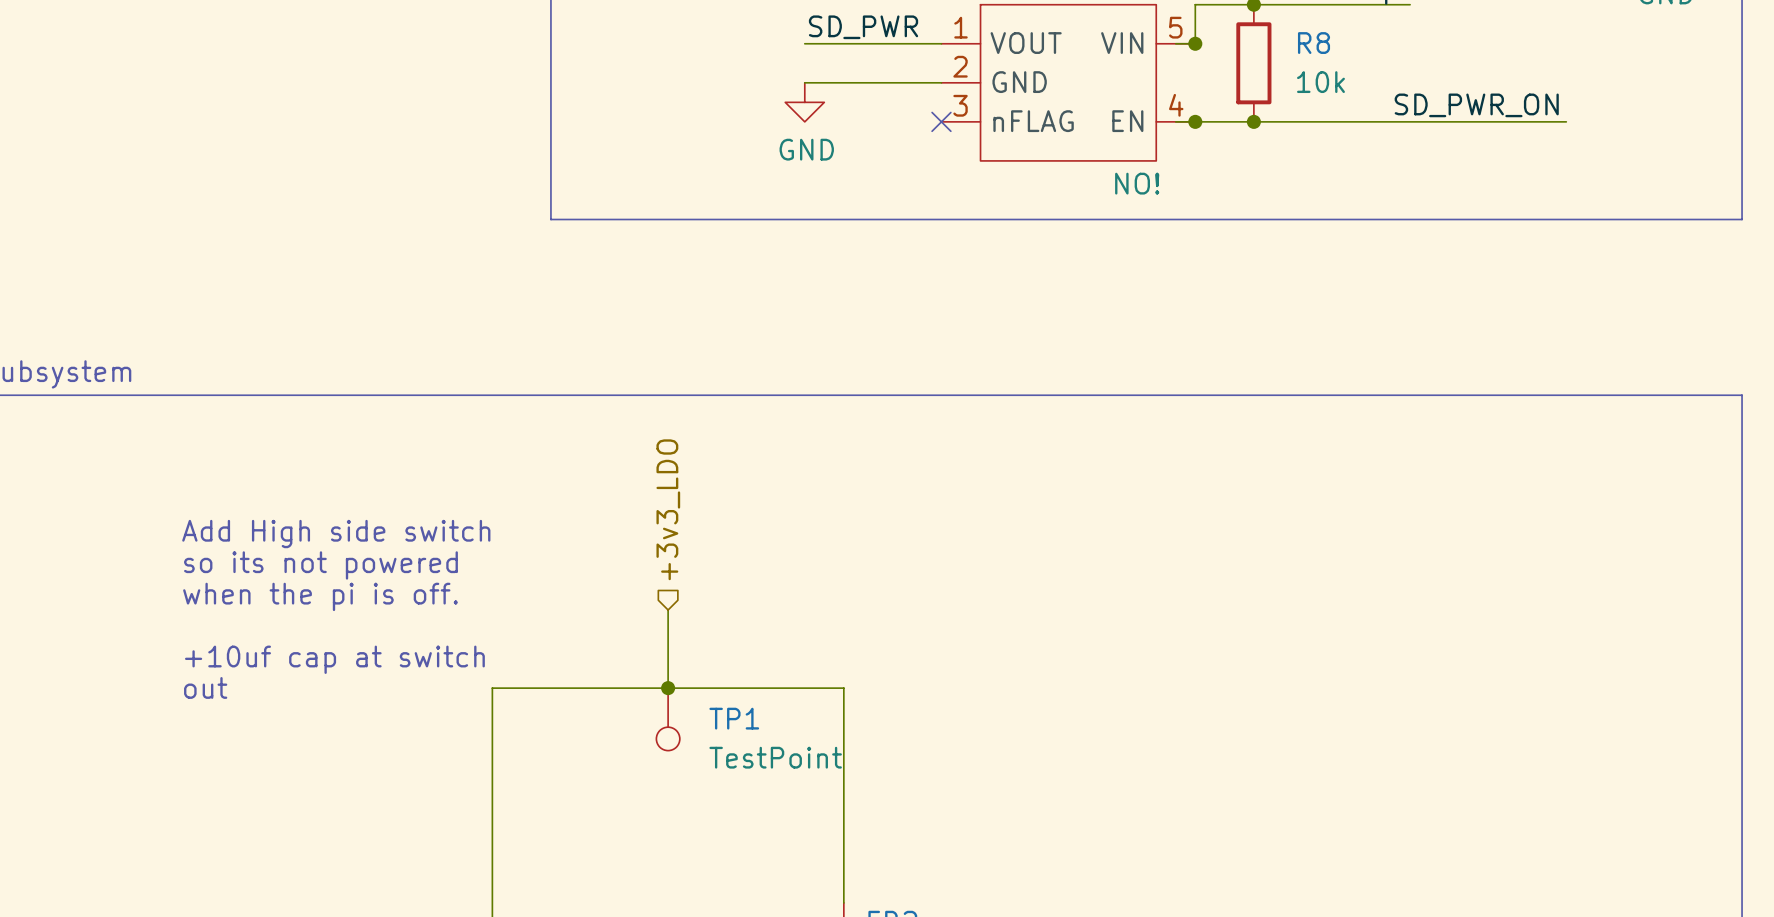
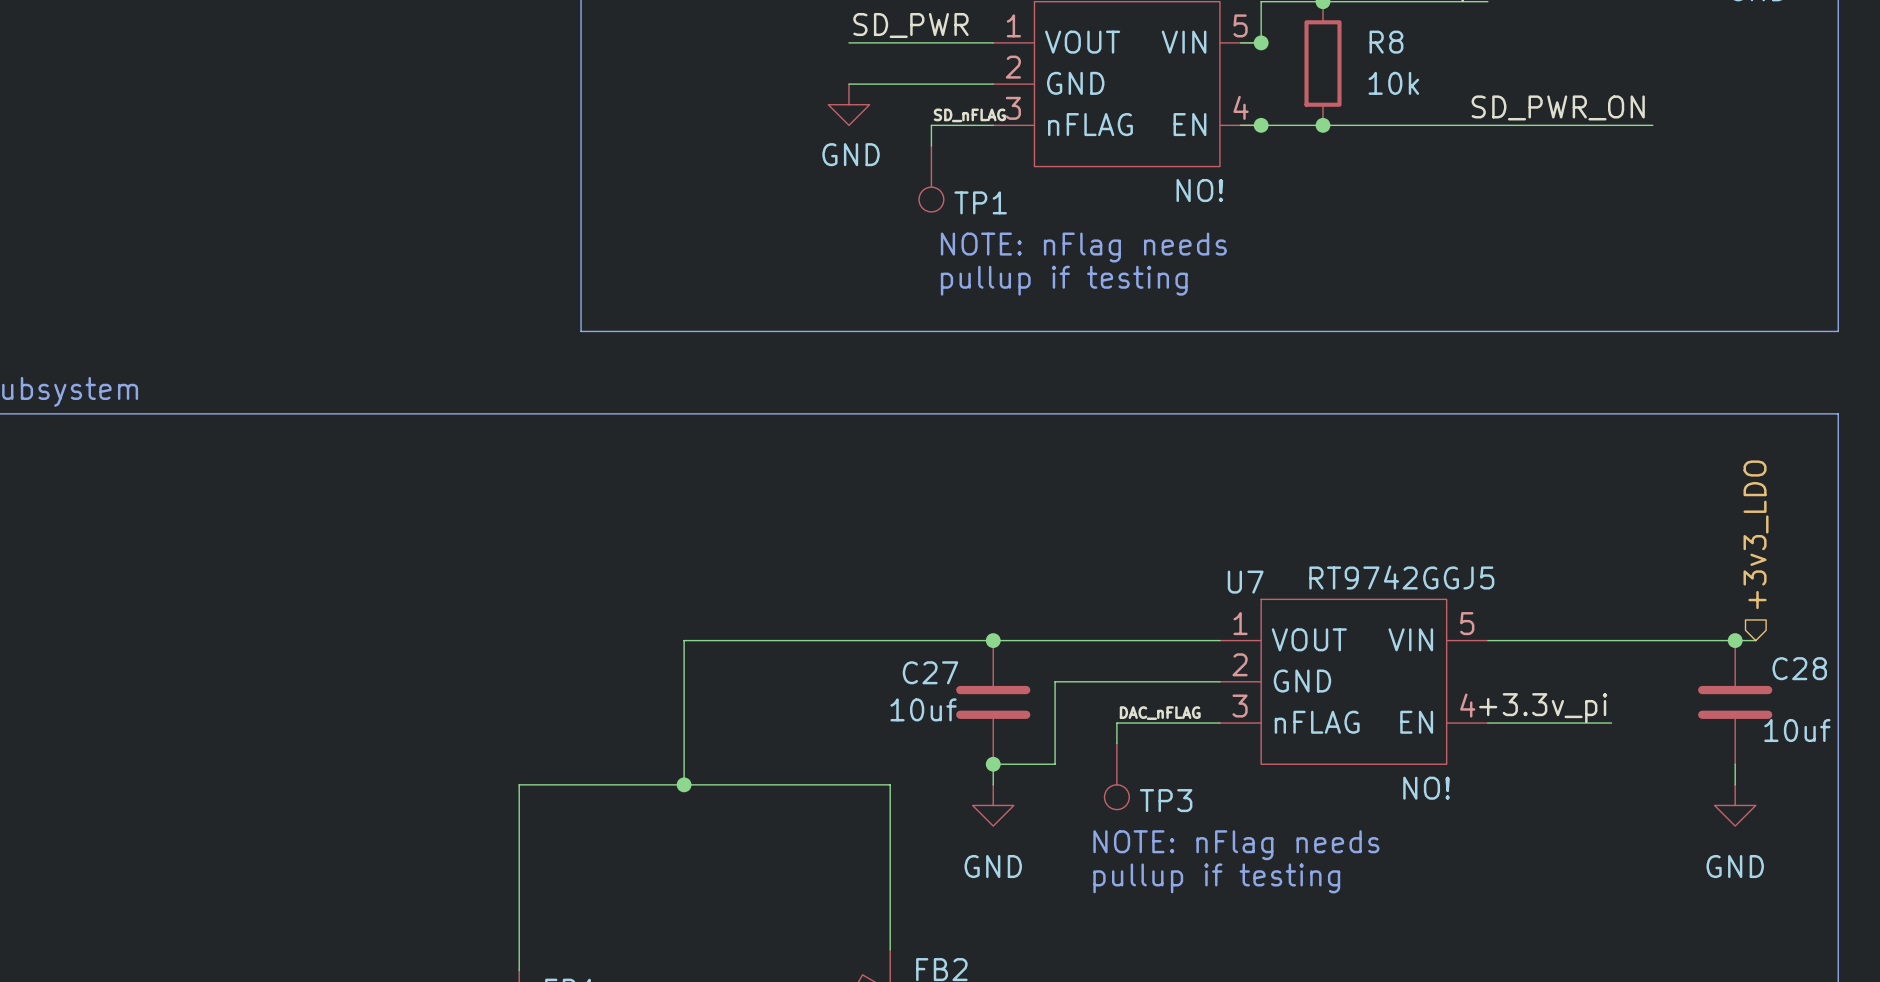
label: none -> SD_nFLAG (969, 115)
wire: none -> (993, 125) (931, 125) (931, 145)
no-connect mark: (941, 121) -> none
line: (550, 219) (1742, 219) -> (581, 228) (581, 331) (1838, 331) (1838, 228)
text: none -> NOTE: nFlag needs (1083, 247)
text: none -> pullup if testing (1064, 280)
hierarchical label: +3v3_LDO (668, 509) -> none
hierarchical label: none -> +3v3_LDO (1756, 534)
text: Add High side switch (336, 534) -> none
text: so its not powered (320, 565) -> none
text: when the pi is off. (320, 596) -> none
wire: (668, 610) (668, 688) -> none
junction: none -> (993, 640)
wire: none -> (1219, 640) (684, 640) (684, 784)
wire: none -> (1487, 640) (1755, 640)
junction: none -> (1735, 640)
wire: none -> (1219, 681) (1055, 681) (1055, 764) (993, 764) (993, 784)
U7: none -> RT9742GGJ5 (1353, 681)
text: +10uf cap at switch (334, 659) -> none
C27: none -> 10uf (993, 702)
C28: none -> 10uf (1735, 702)
label: none -> +3.3v_pi (1543, 708)
label: none -> DAC_nFLAG (1160, 713)
text: out (205, 687) -> none
junction position: (668, 688) -> (684, 784)
wire: none -> (1219, 723) (1116, 723) (1116, 743)
wire: none -> (1487, 723) (1611, 723)
TP1 name position: TP1 (734, 718) -> TP1 (980, 202)
TP1 position: (668, 719) -> (931, 178)
junction: none -> (993, 764)
wire: none -> (1735, 764) (1735, 784)
TP3: none -> (1116, 776)
wire: (492, 746) (492, 688) (843, 688) (843, 746) -> (519, 784) (890, 784)
TP1 value: TestPoint (775, 757) -> none
power symbol: none -> GND (993, 805)
power symbol: none -> GND (1735, 805)
text: none -> NOTE: nFlag needs (1236, 845)
text: none -> pullup if testing (1216, 878)

